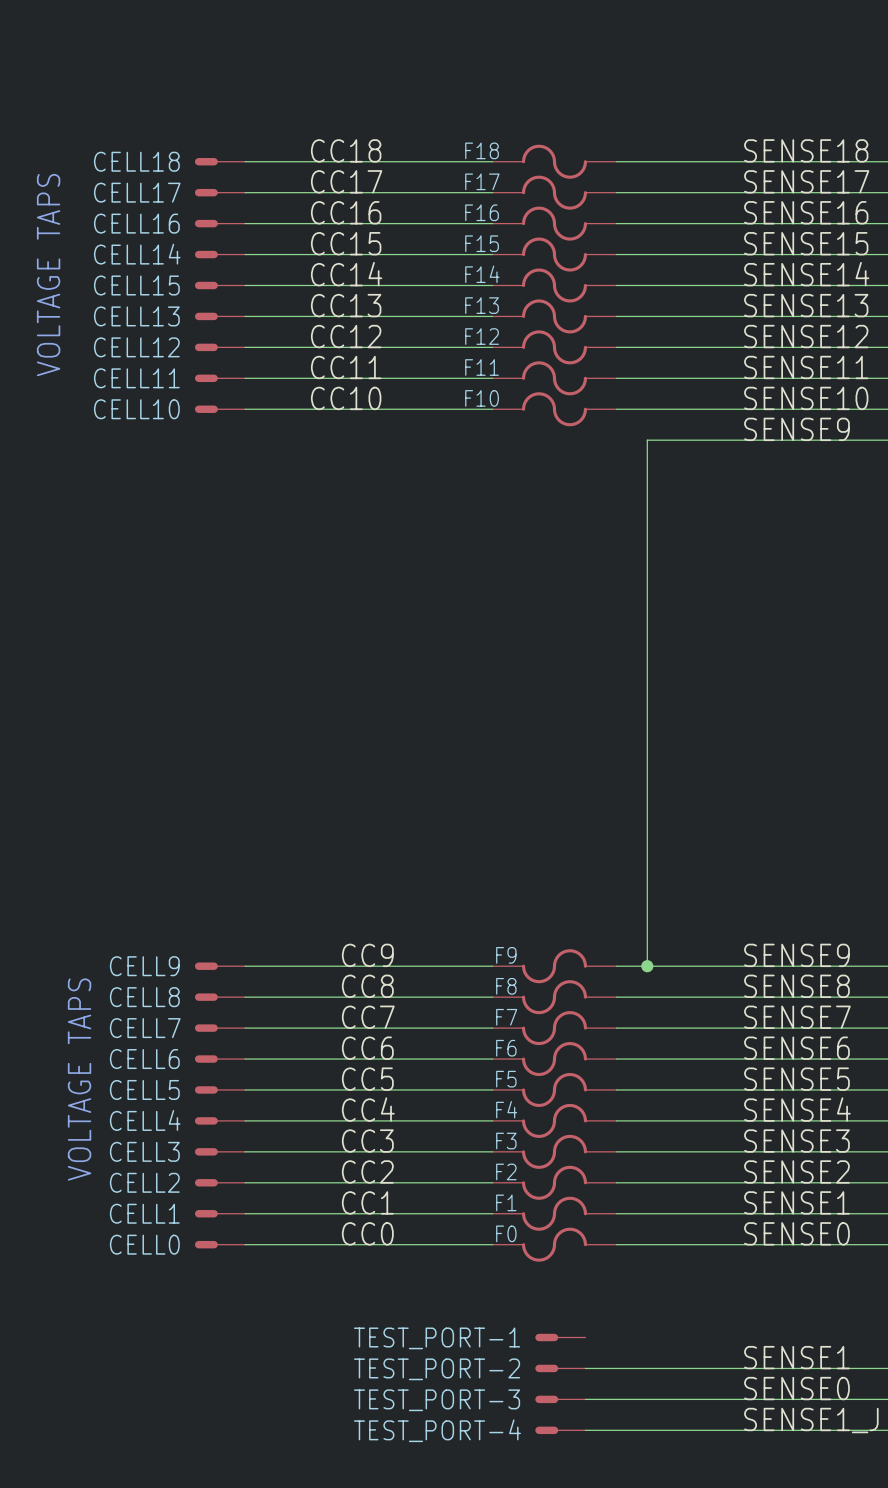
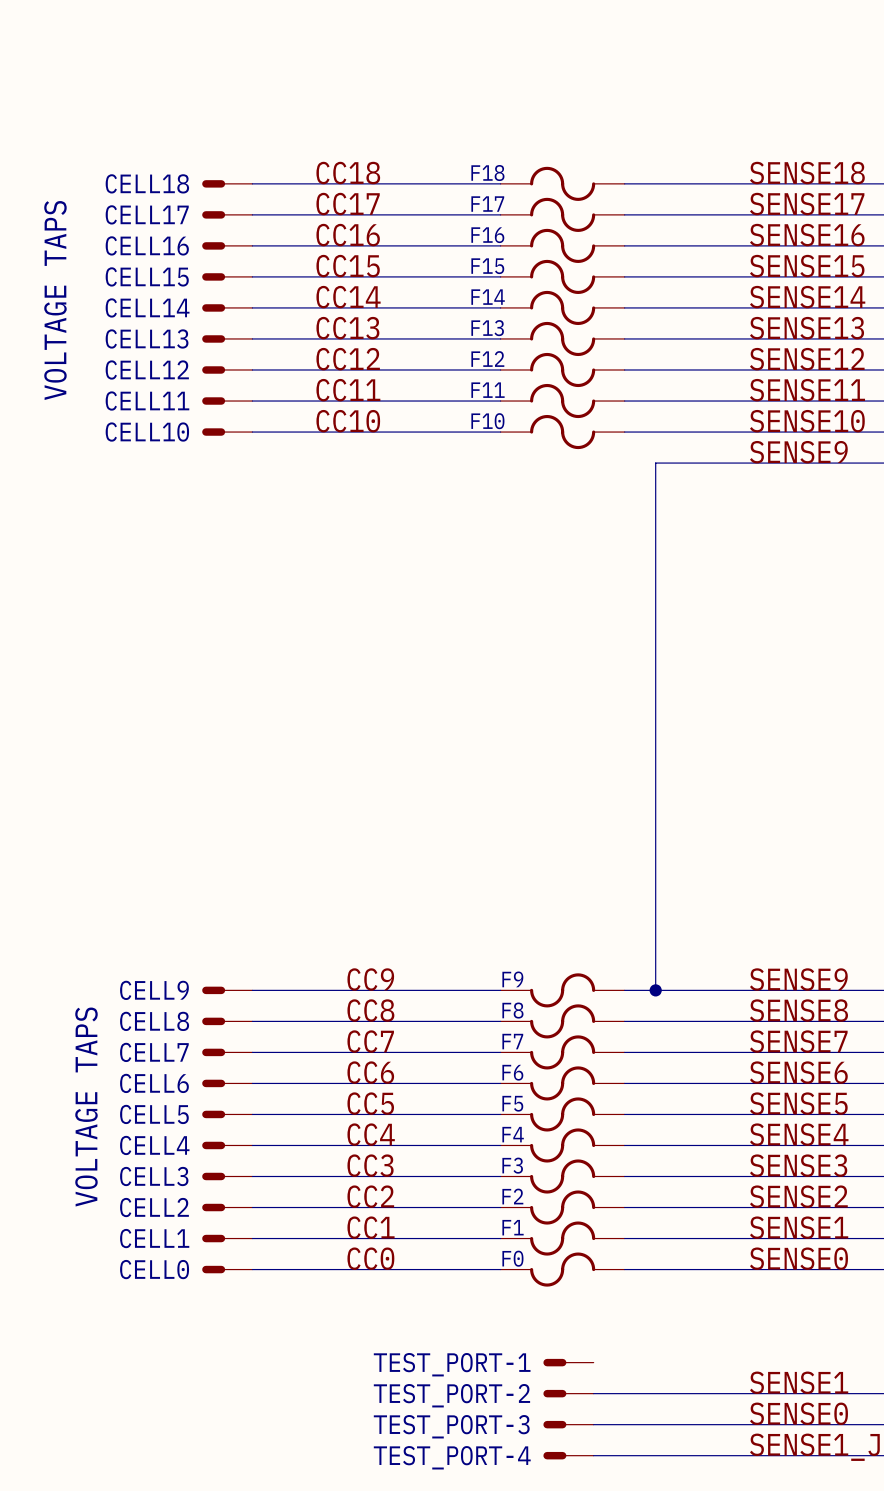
CELL14 name: CELL14 (137, 254) -> CELL15 (147, 276)
CELL15 name: CELL15 (136, 285) -> CELL14 (147, 307)

